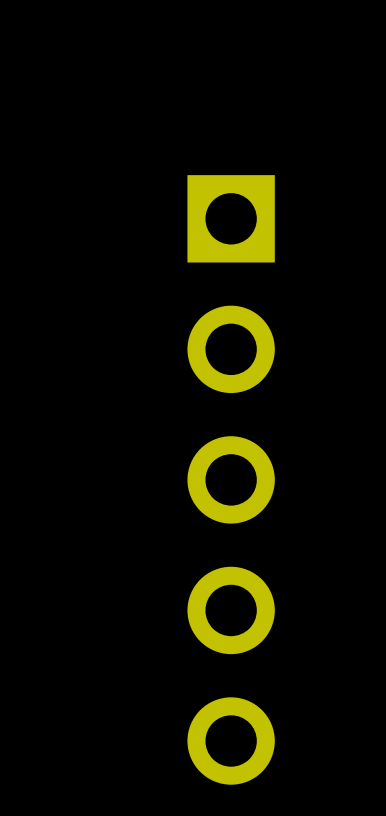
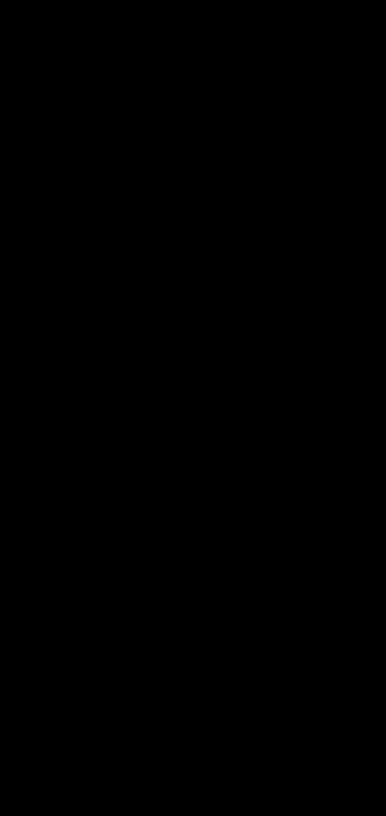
part: (231, 479) -> none

